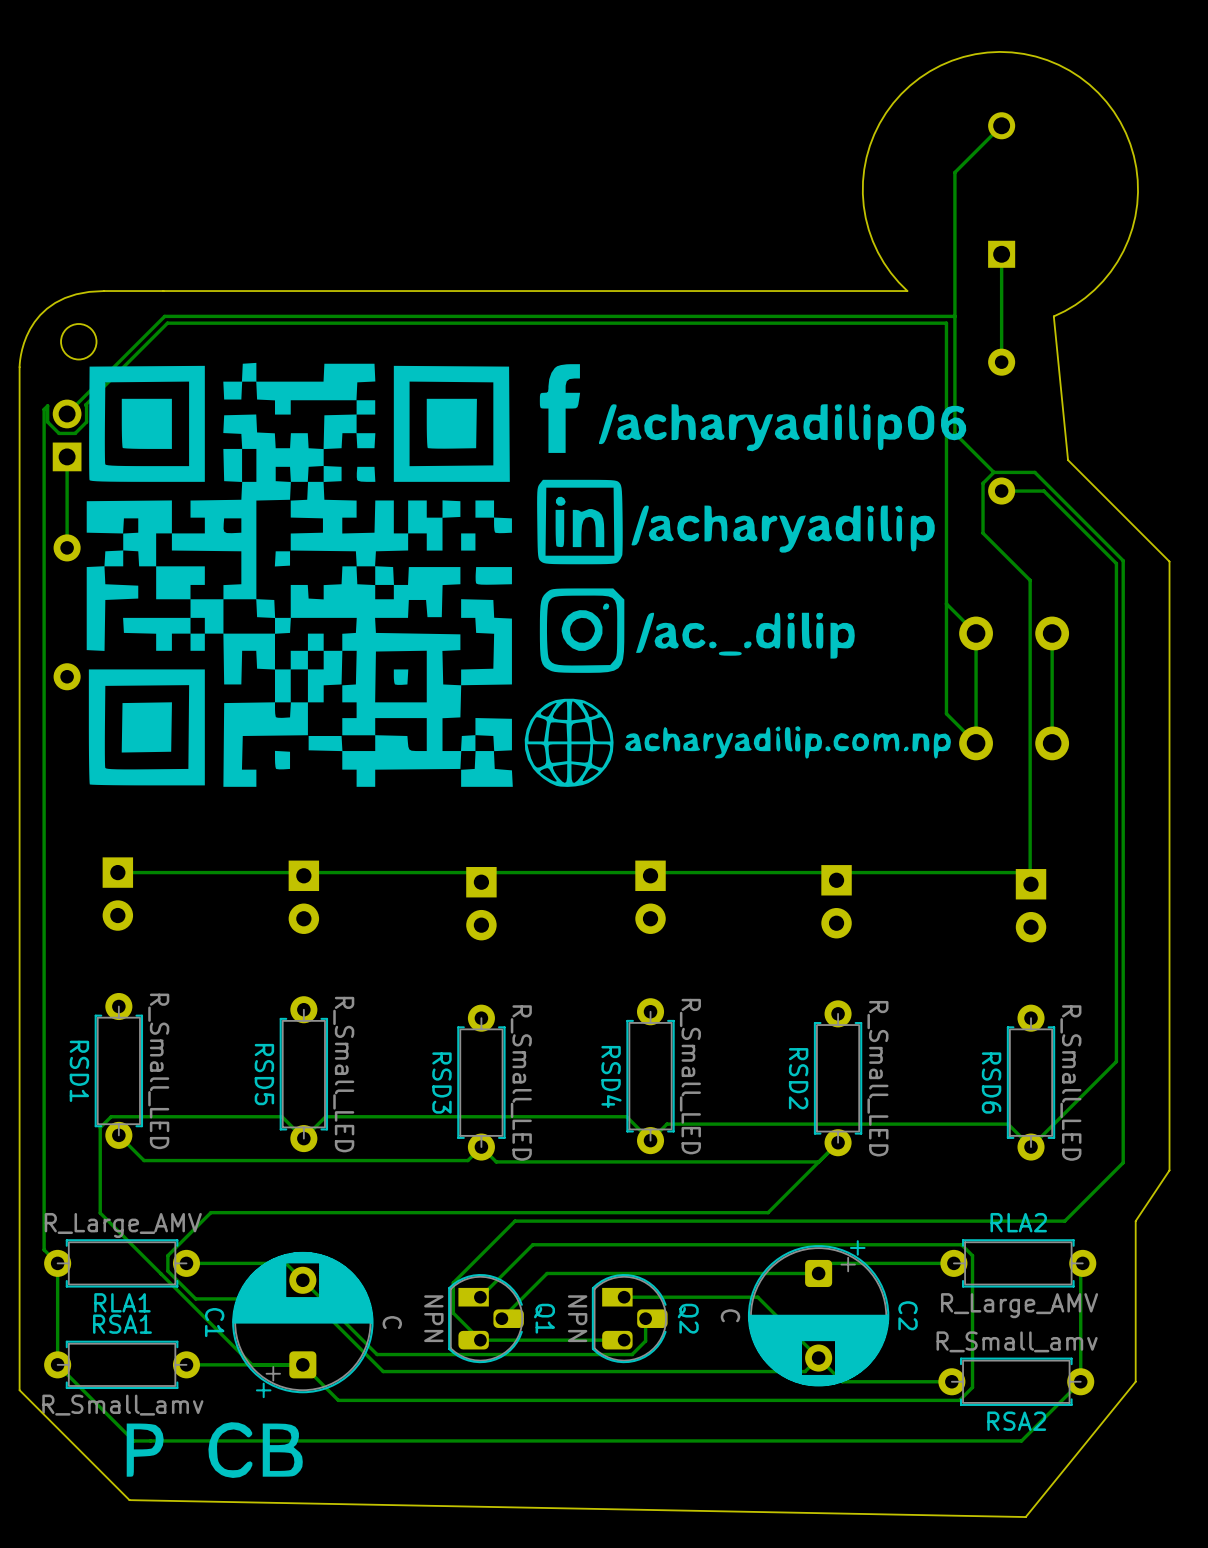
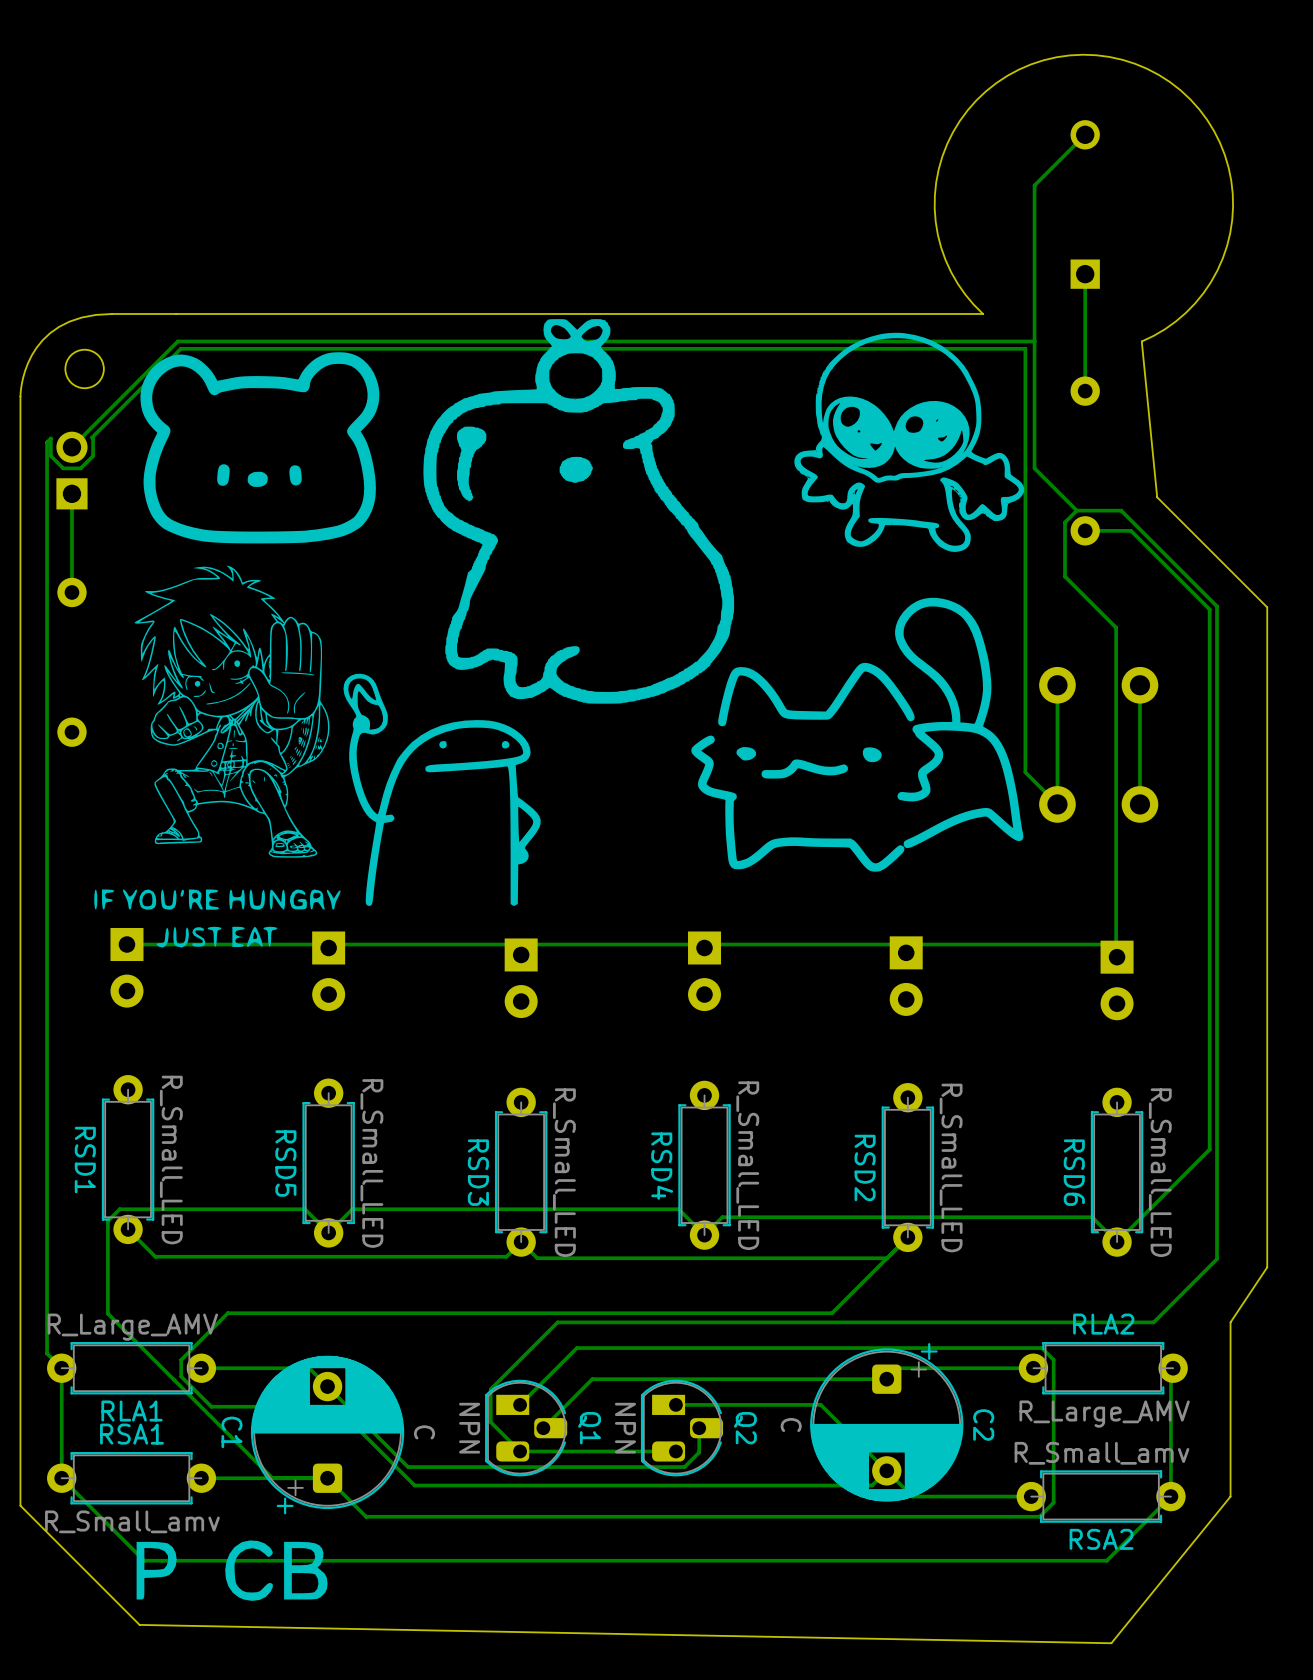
drawing: none -> [94, 319, 1024, 948]
drawing: none -> [794, 332, 1025, 552]
drawing: none -> [140, 352, 380, 544]
drawing: [86, 362, 951, 787] -> none
drawing: [539, 364, 967, 453] -> none
drawing: [537, 479, 935, 565] -> none
drawing: [539, 588, 855, 673] -> none
track: (946, 603) (976, 633) -> none

